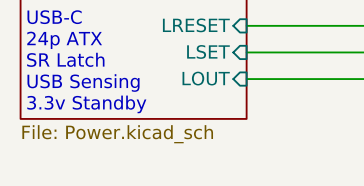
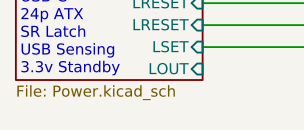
sheet pin: LSET (208, 51) -> LRESET (161, 24)
sheet pin: LOUT (206, 78) -> LSET (171, 46)
sheet pin: none -> LOUT (169, 68)

